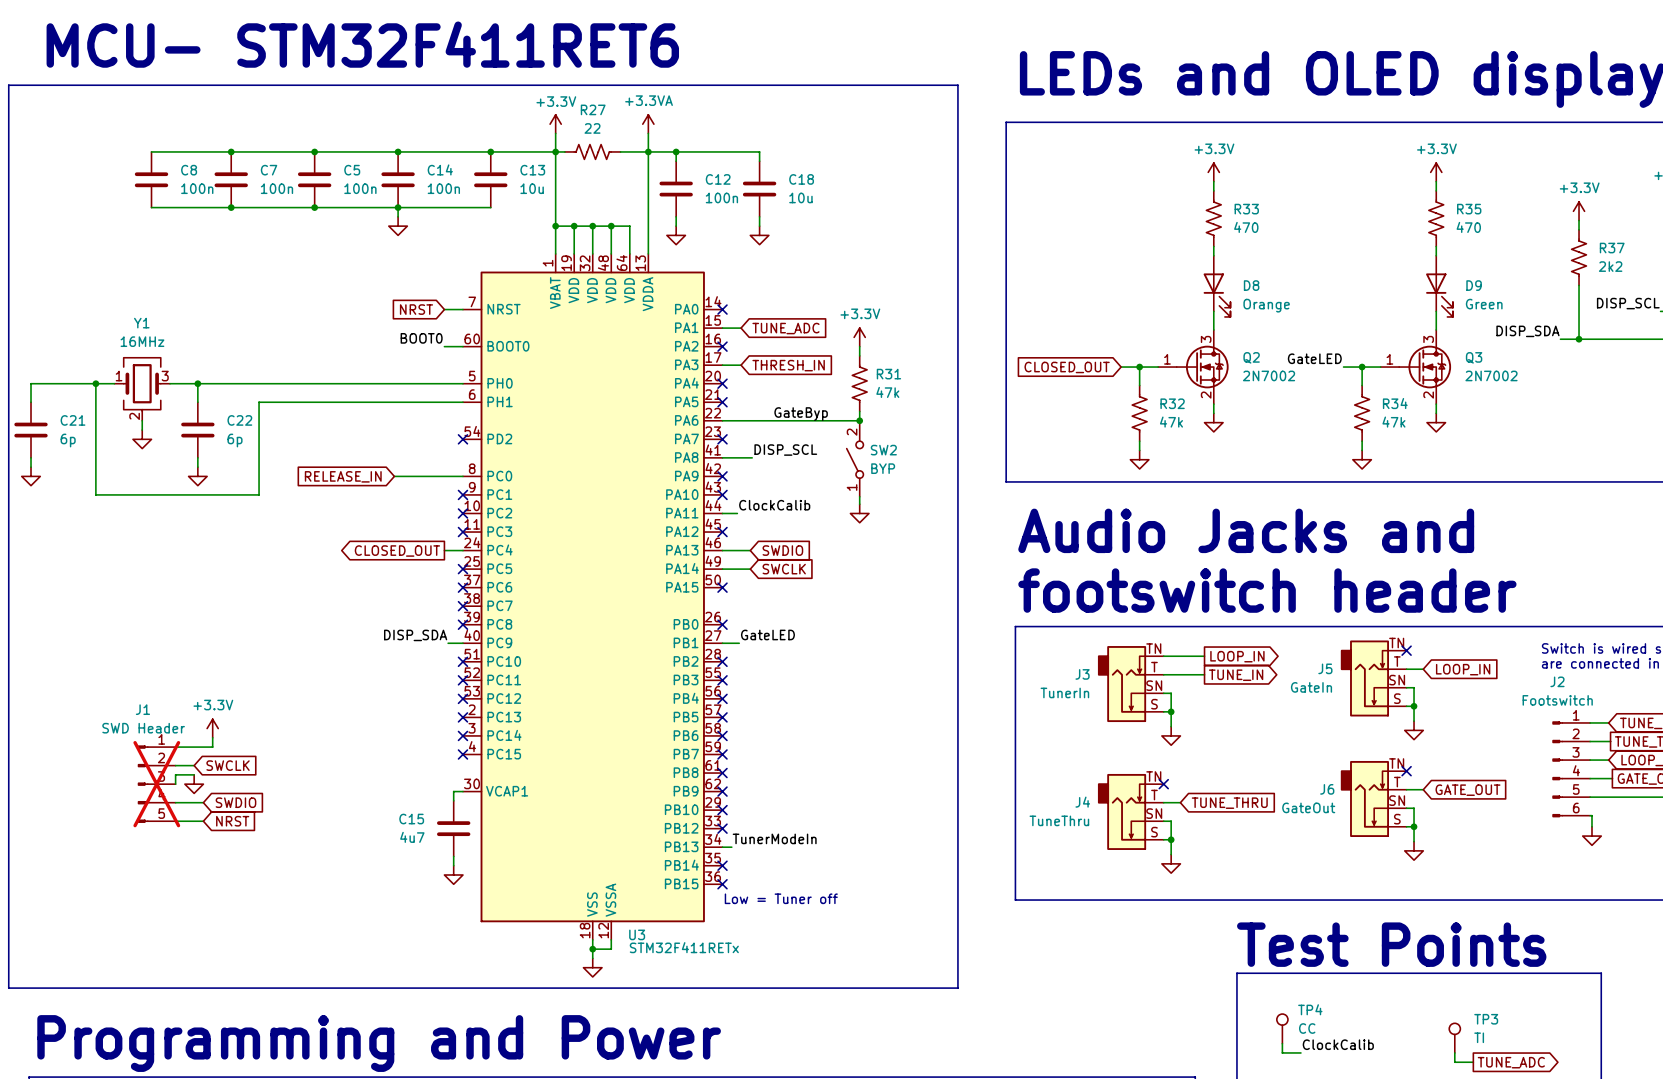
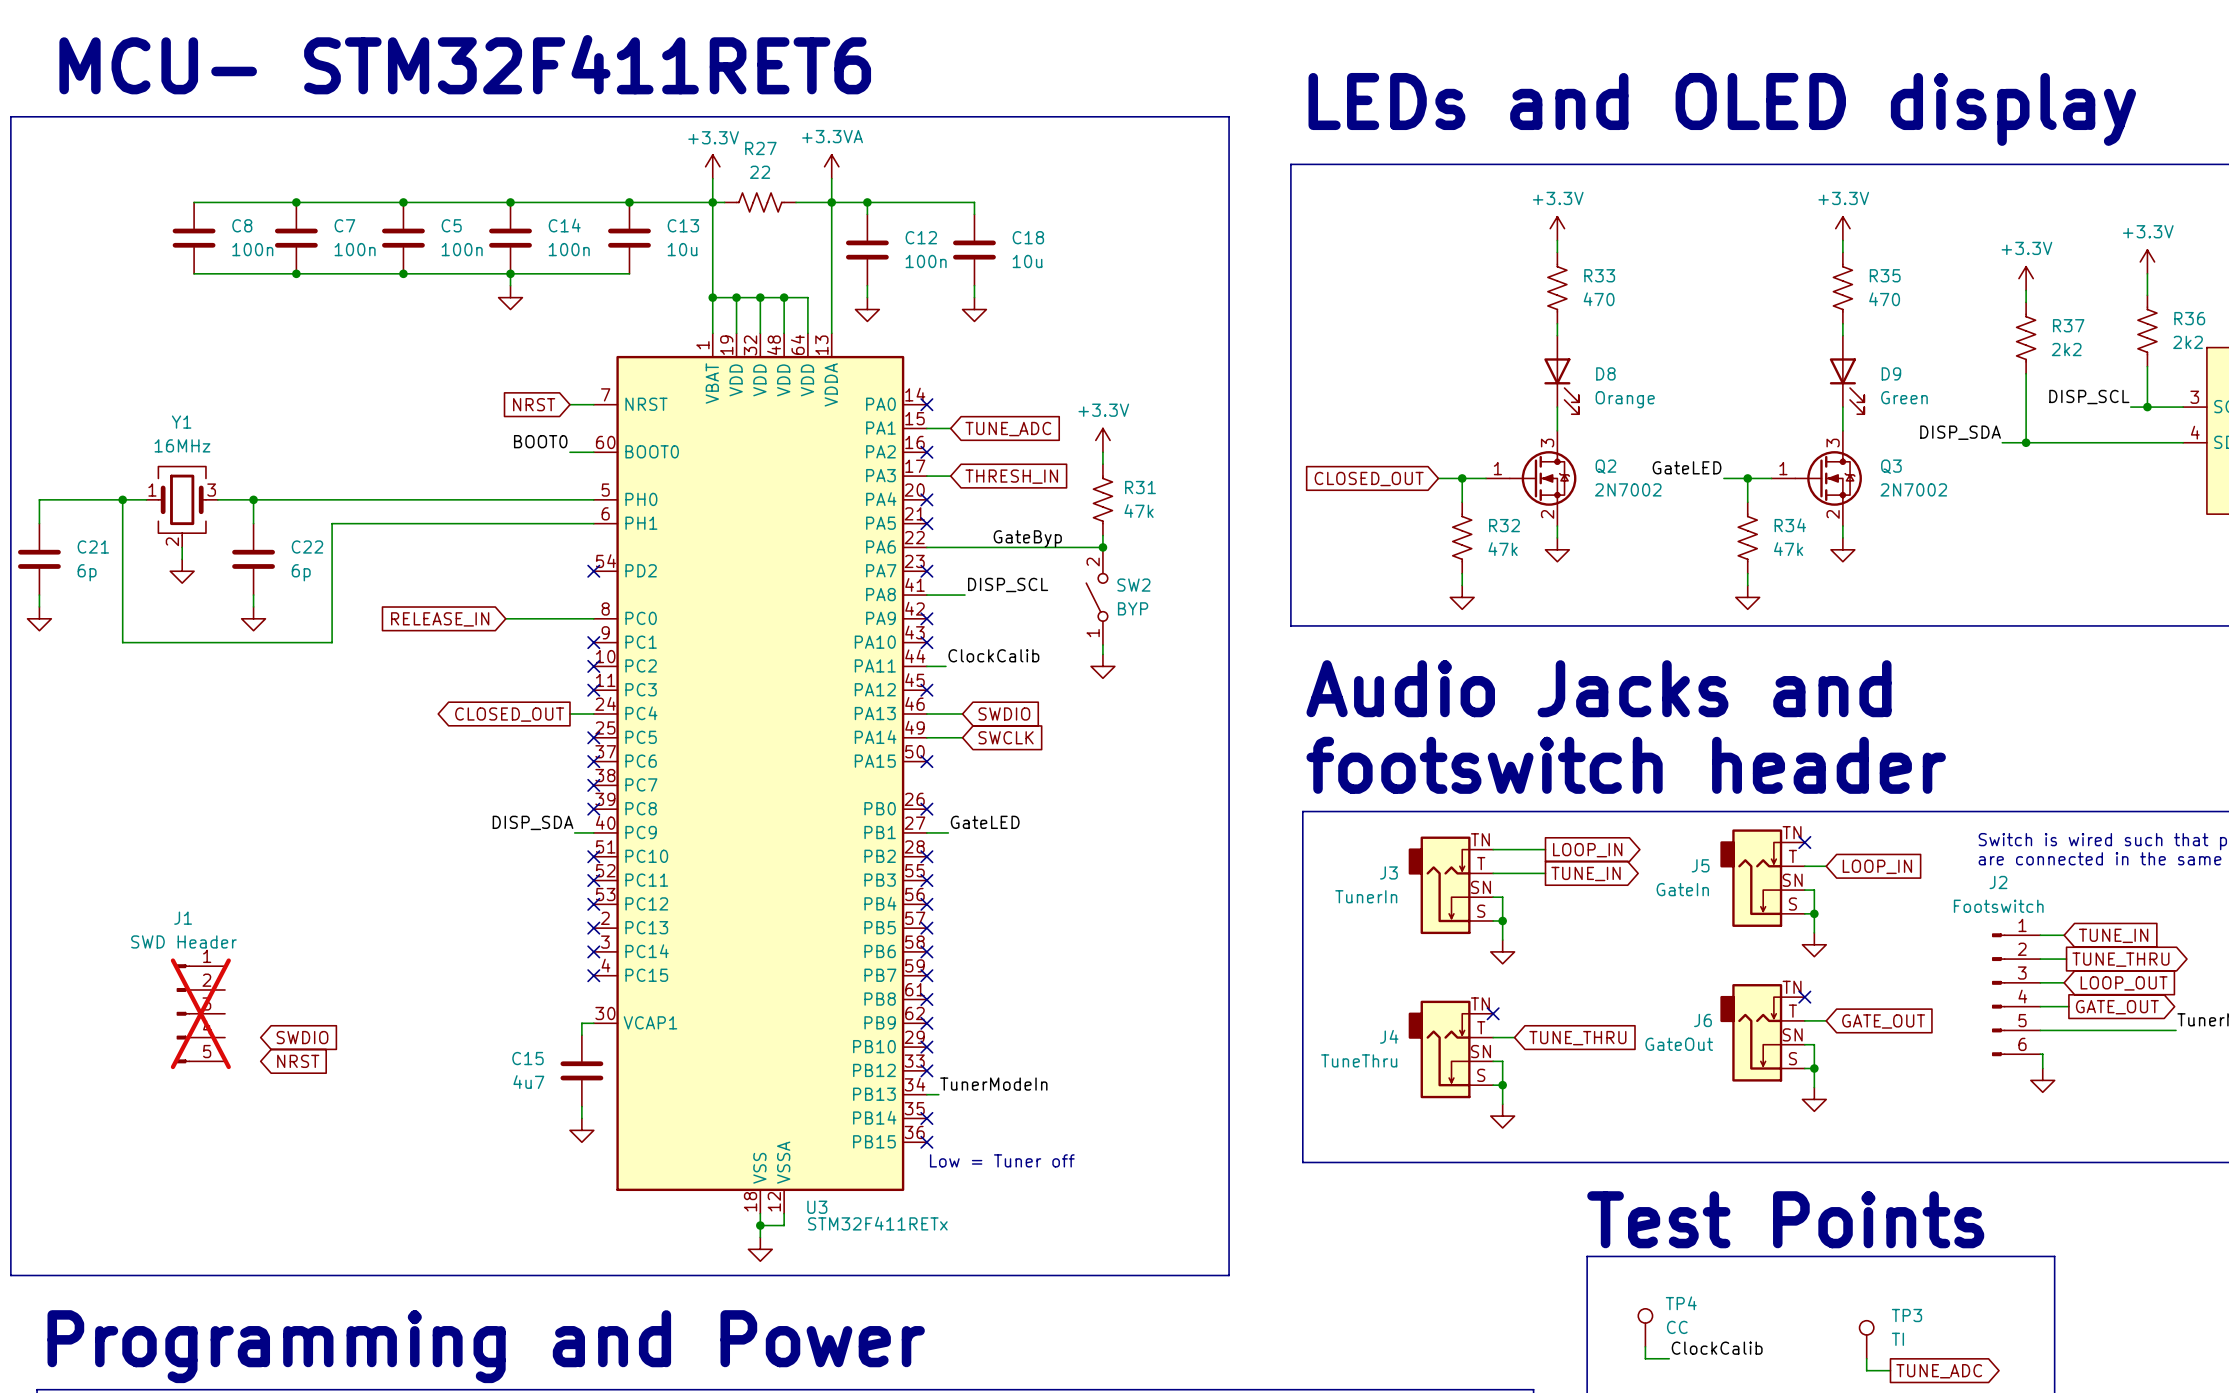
power symbol: +3.3V (212, 728) -> none
wire: (212, 737) (212, 747) (175, 747) -> none
wire: (175, 765) (194, 765) -> none
global label: SWCLK (228, 765) -> none
wire: (194, 774) (175, 774) (175, 784) -> none
power symbol: (194, 784) -> none
wire: (175, 802) (203, 802) -> none
wire: (175, 821) (203, 821) -> none

